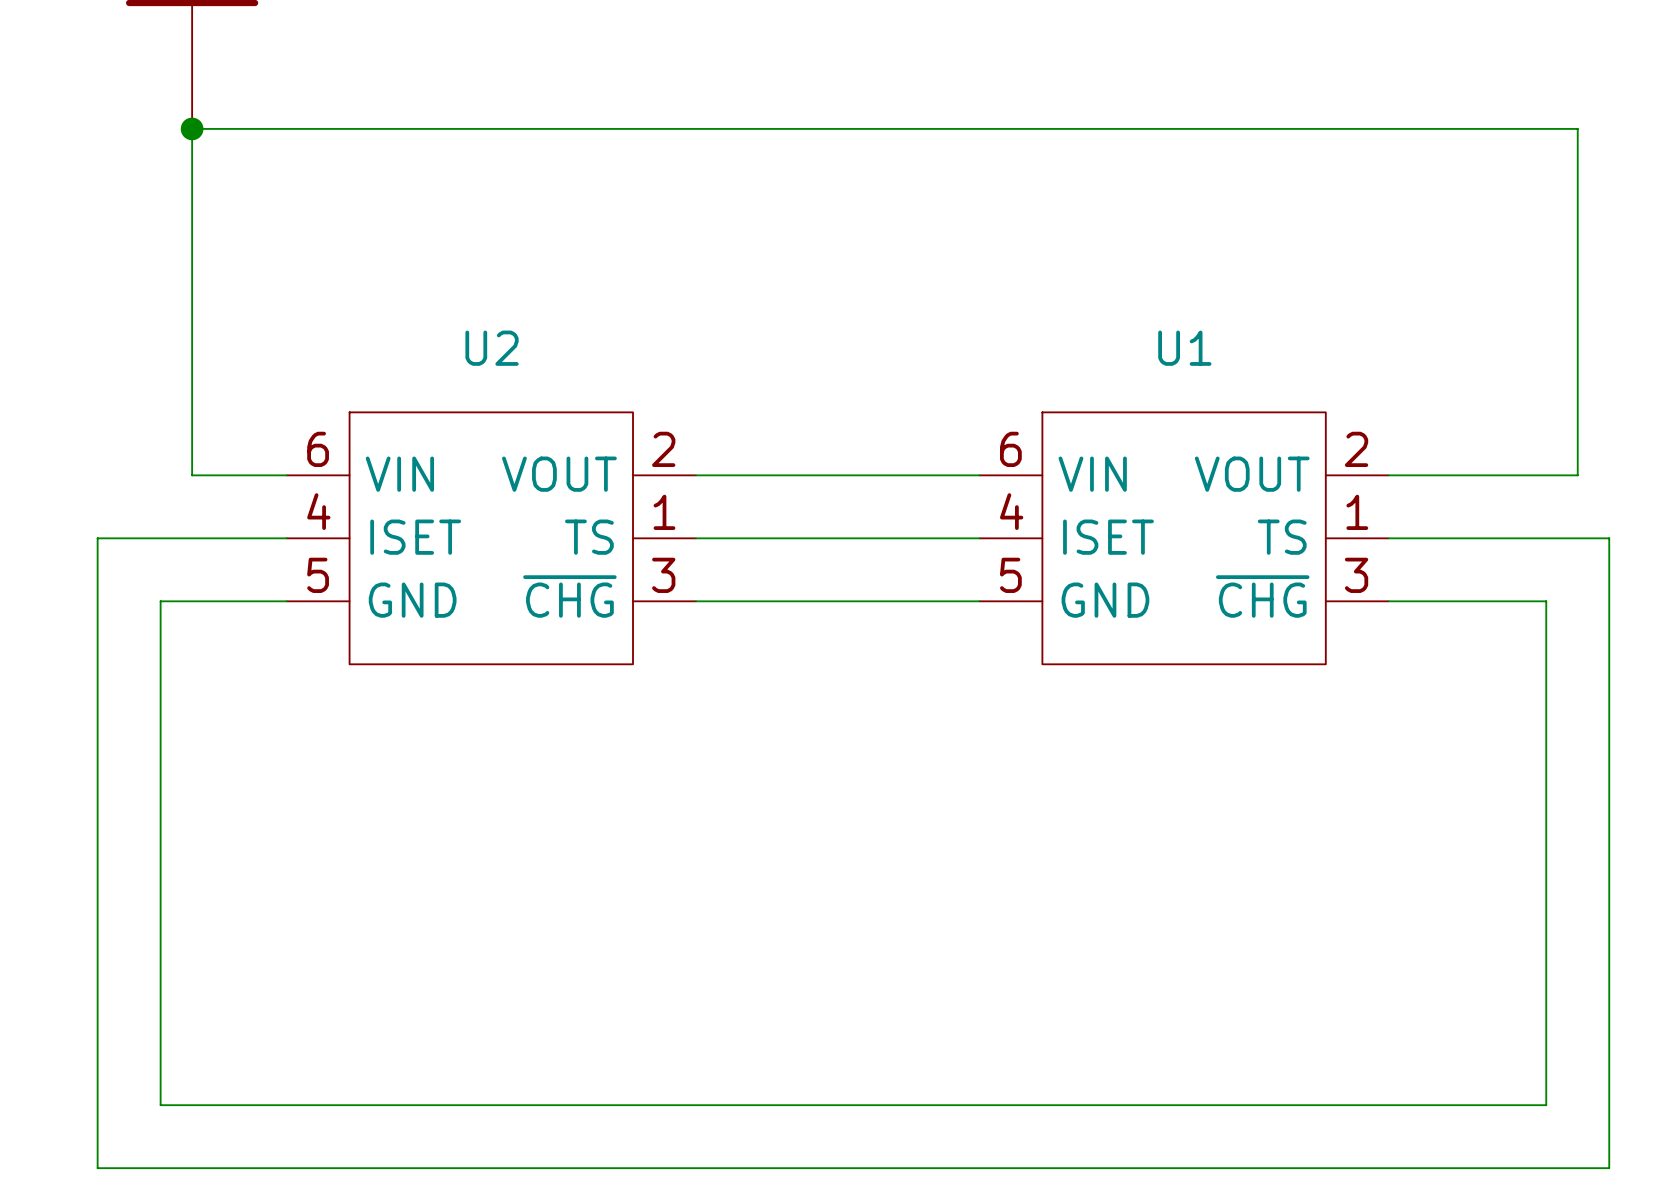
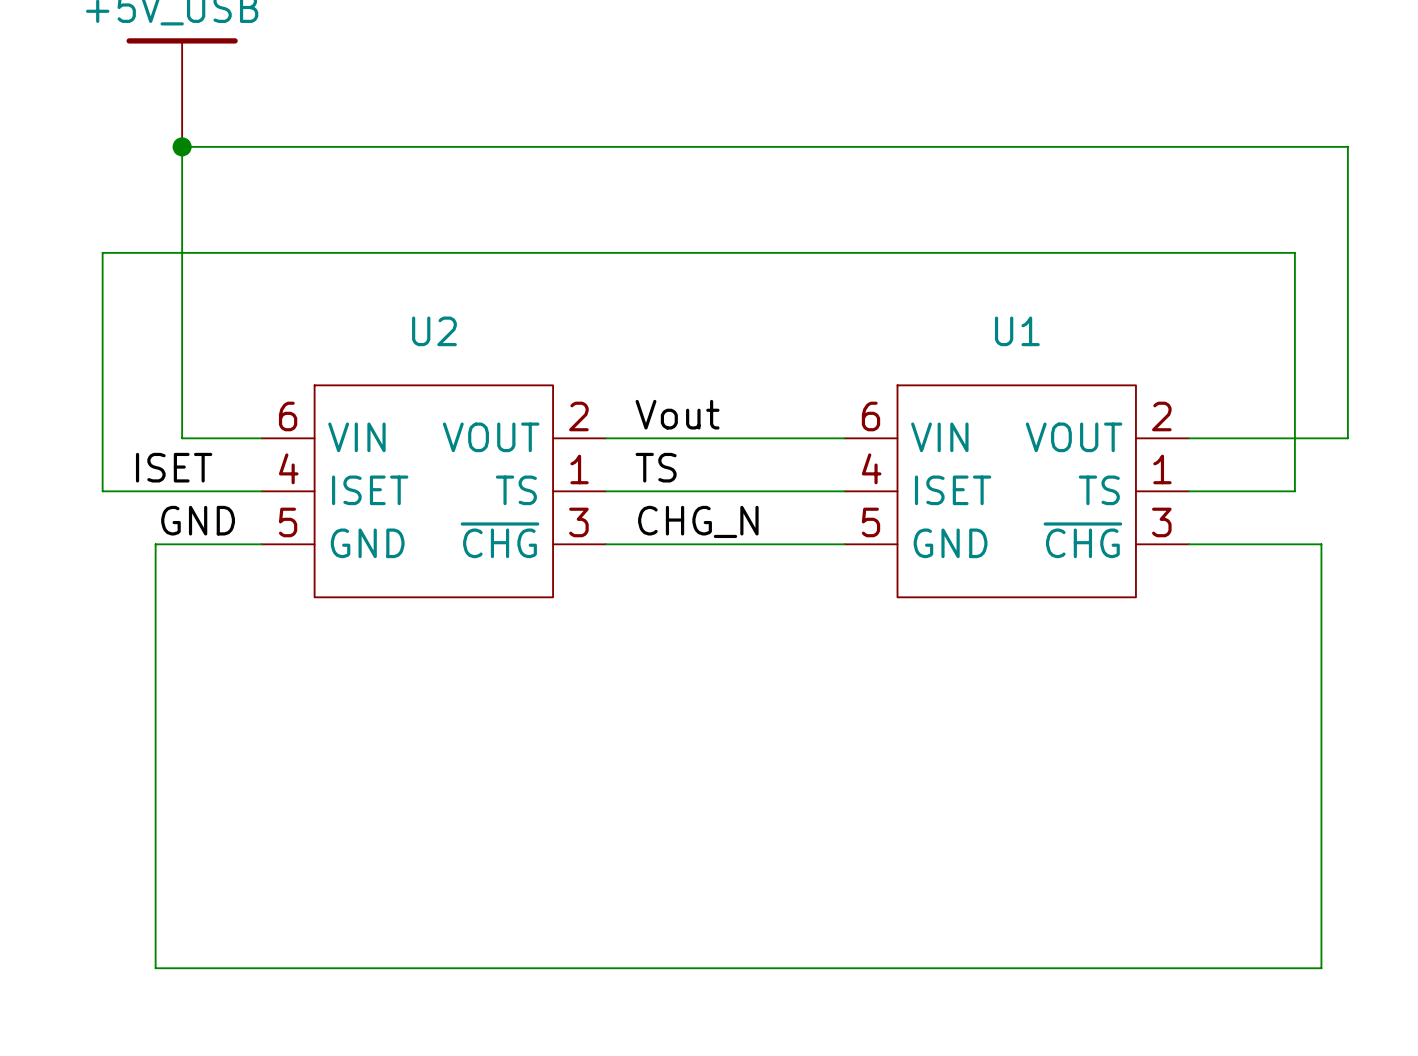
label: none -> Vout (677, 414)
label: none -> ISET (174, 467)
label: none -> TS (656, 467)
wire: (97, 538) (97, 1168) (1609, 1168) (1609, 538) (1514, 538) -> (102, 491) (102, 252) (1294, 252) (1294, 491)
label: none -> GND (198, 520)
label: none -> CHG_N (698, 521)

